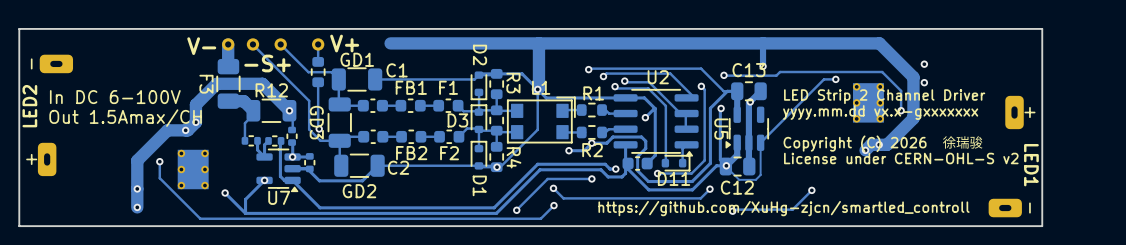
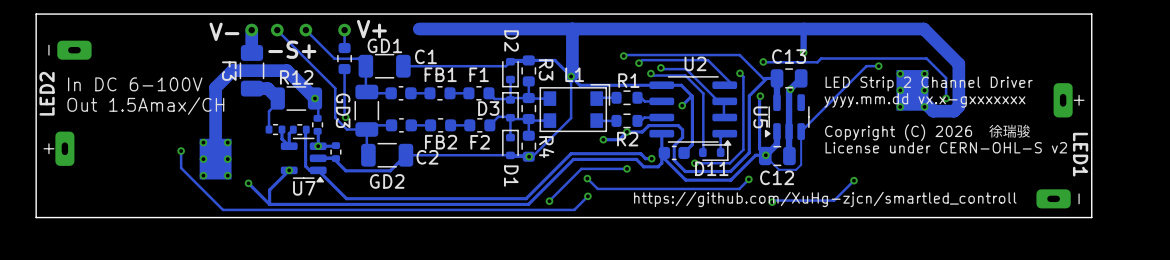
via: (924, 64) -> none
via: (924, 82) -> none
track: (216, 83) (195, 104) (195, 122) (187, 130) (167, 130) (137, 160) (137, 207) -> (240, 70) (232, 70) (215, 87) (215, 159)
via: (195, 122) -> none
track: (908, 123) (887, 144) (871, 144) (865, 150) -> (954, 111) (933, 111) (912, 90)
via: (185, 130) -> none
via: (879, 144) -> none
via: (865, 150) -> none
via: (137, 188) -> none
via: (137, 207) -> none

